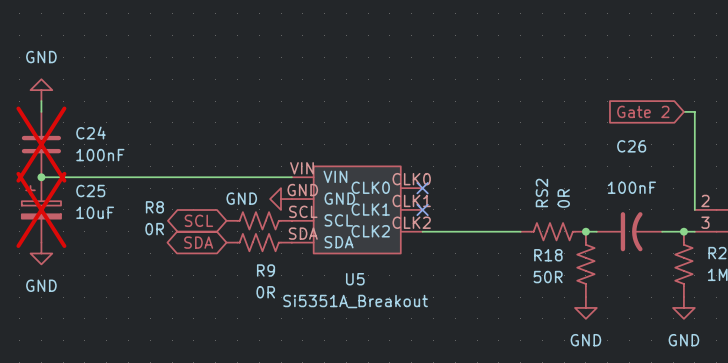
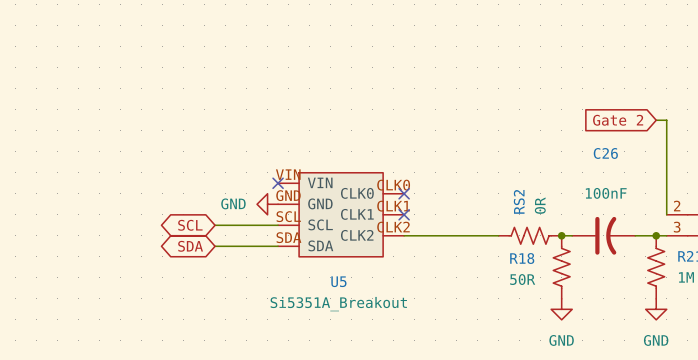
power symbol: GND (41, 90) -> none
wire: (41, 101) (41, 111) -> none
C24: 100nF (41, 144) -> none
wire: (41, 177) (291, 177) -> none
junction: (41, 177) -> none
no-connect mark: none -> (278, 183)
C25: 10uF (41, 209) -> none
R8: 0R (259, 220) -> none
R9: 0R (259, 242) -> none
power symbol: GND (41, 253) -> none

